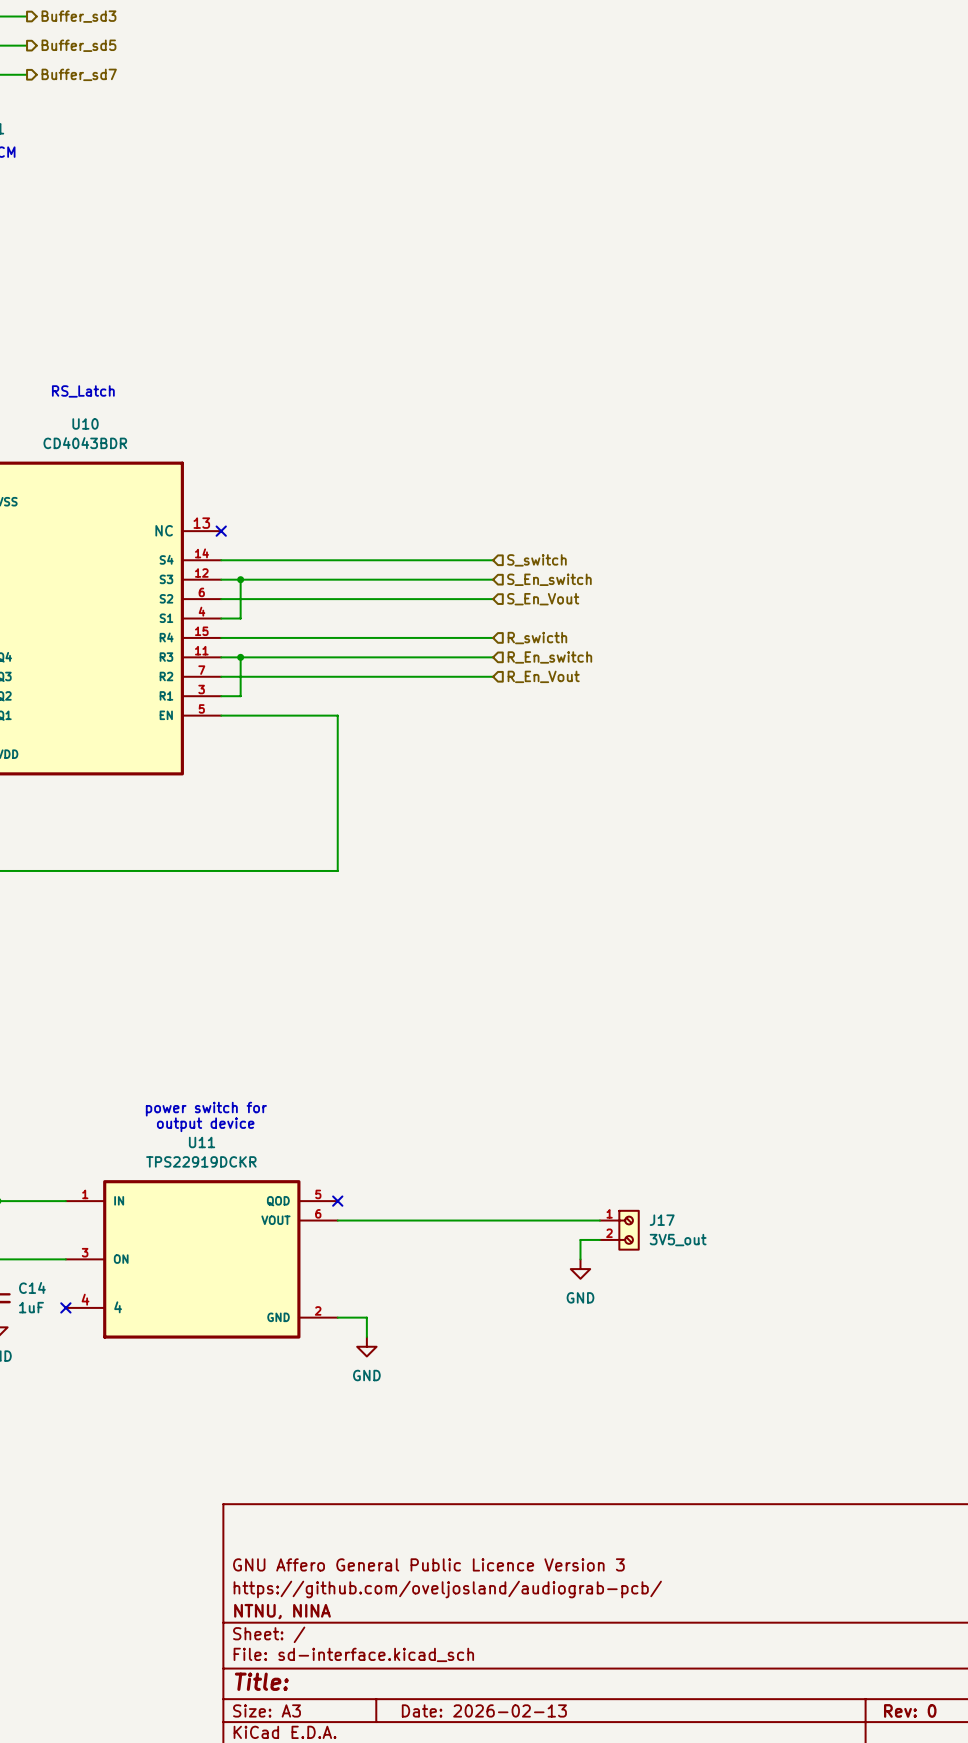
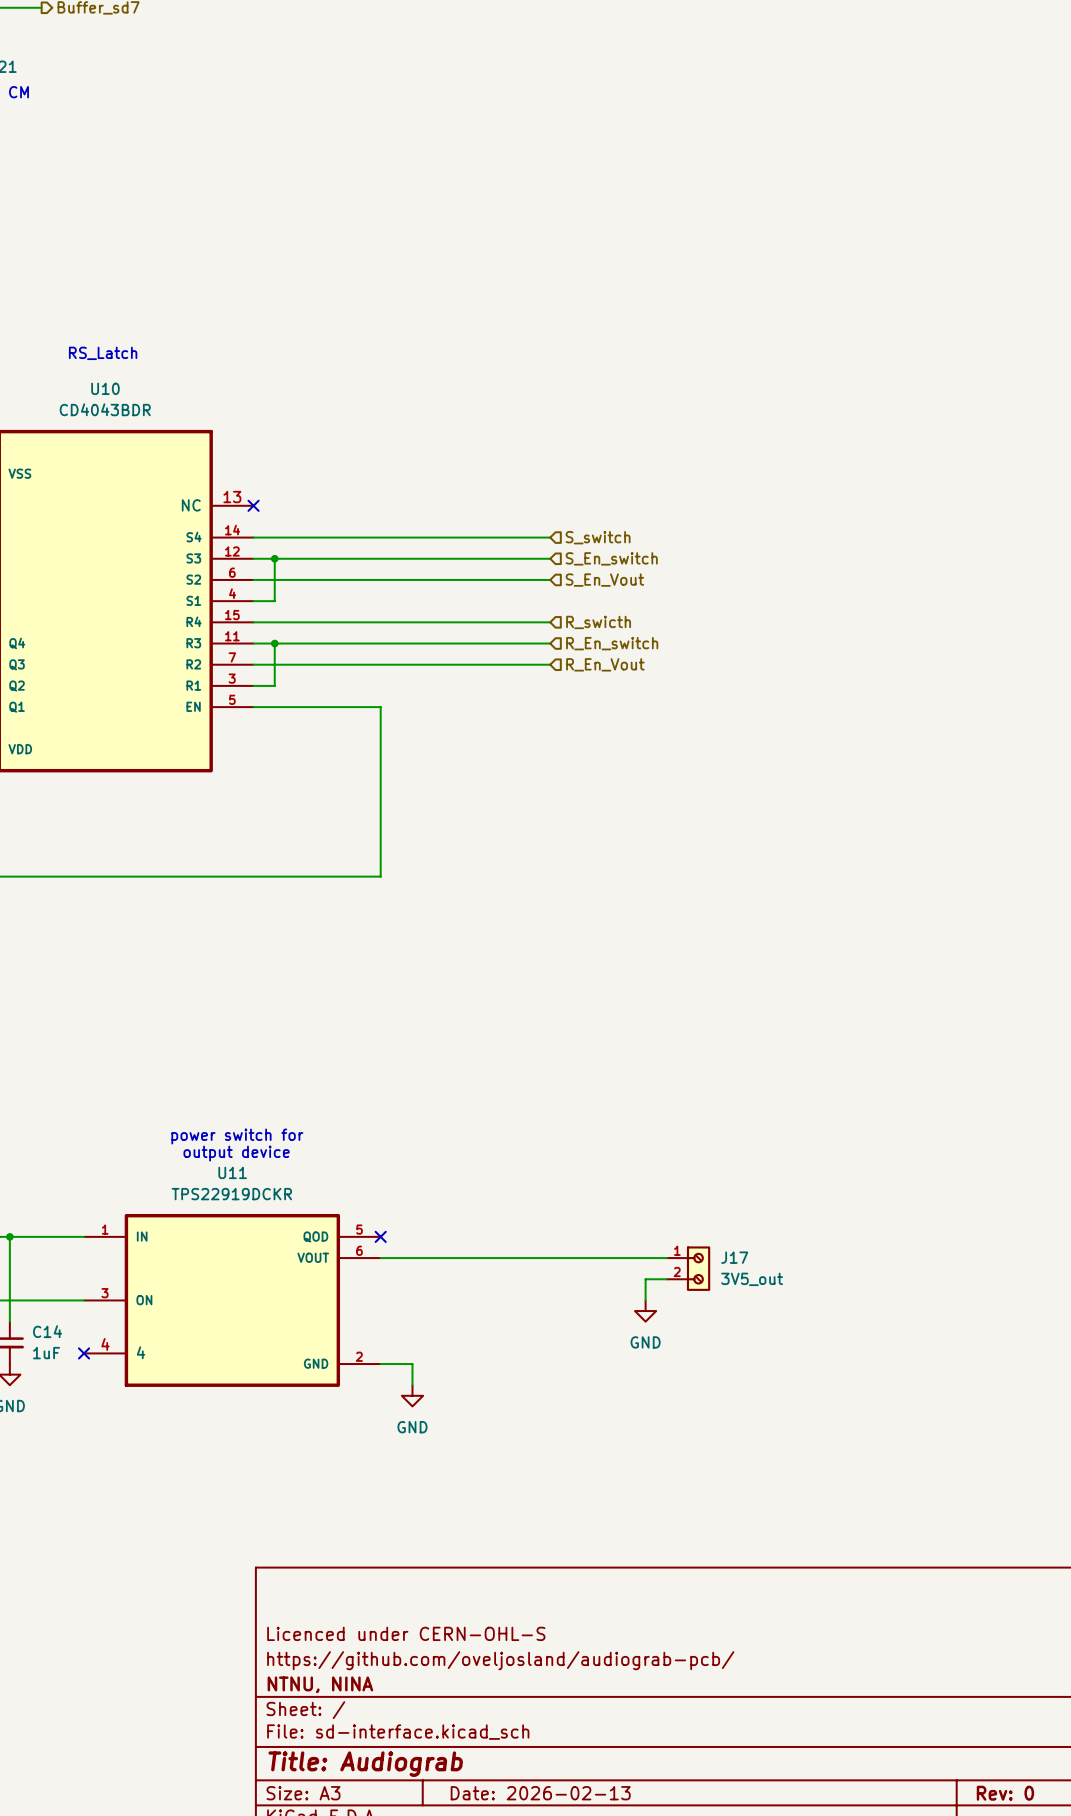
title block: GNU Affero General Public Licence Version 3 (428, 1564) -> Licenced under CERN-OHL-S (406, 1633)
title block: Title: (261, 1681) -> Title: Audiograb (365, 1764)

